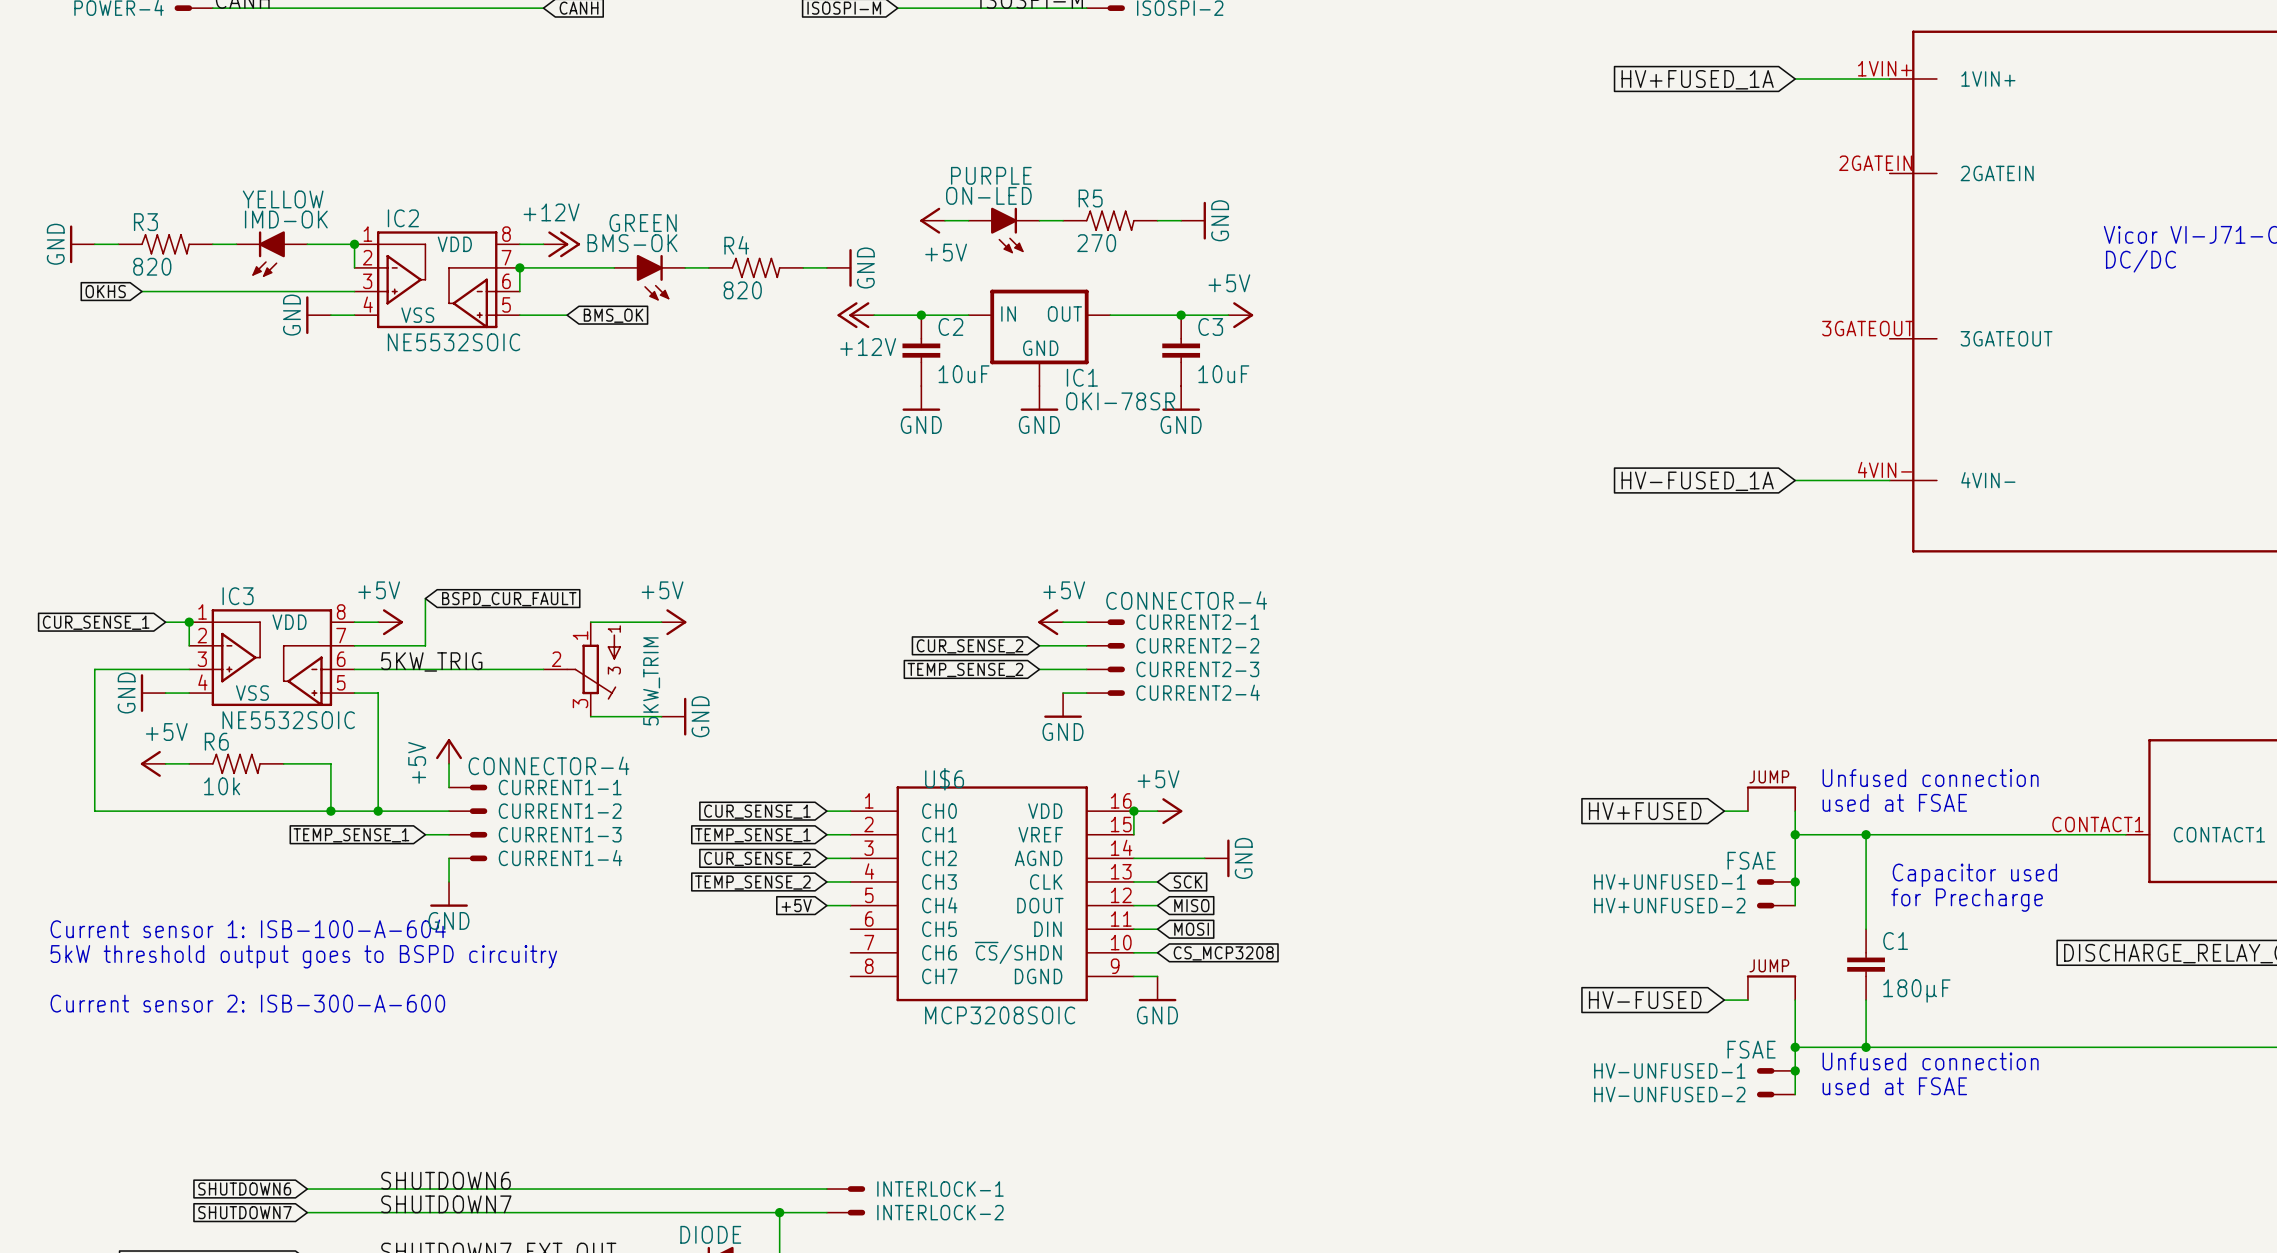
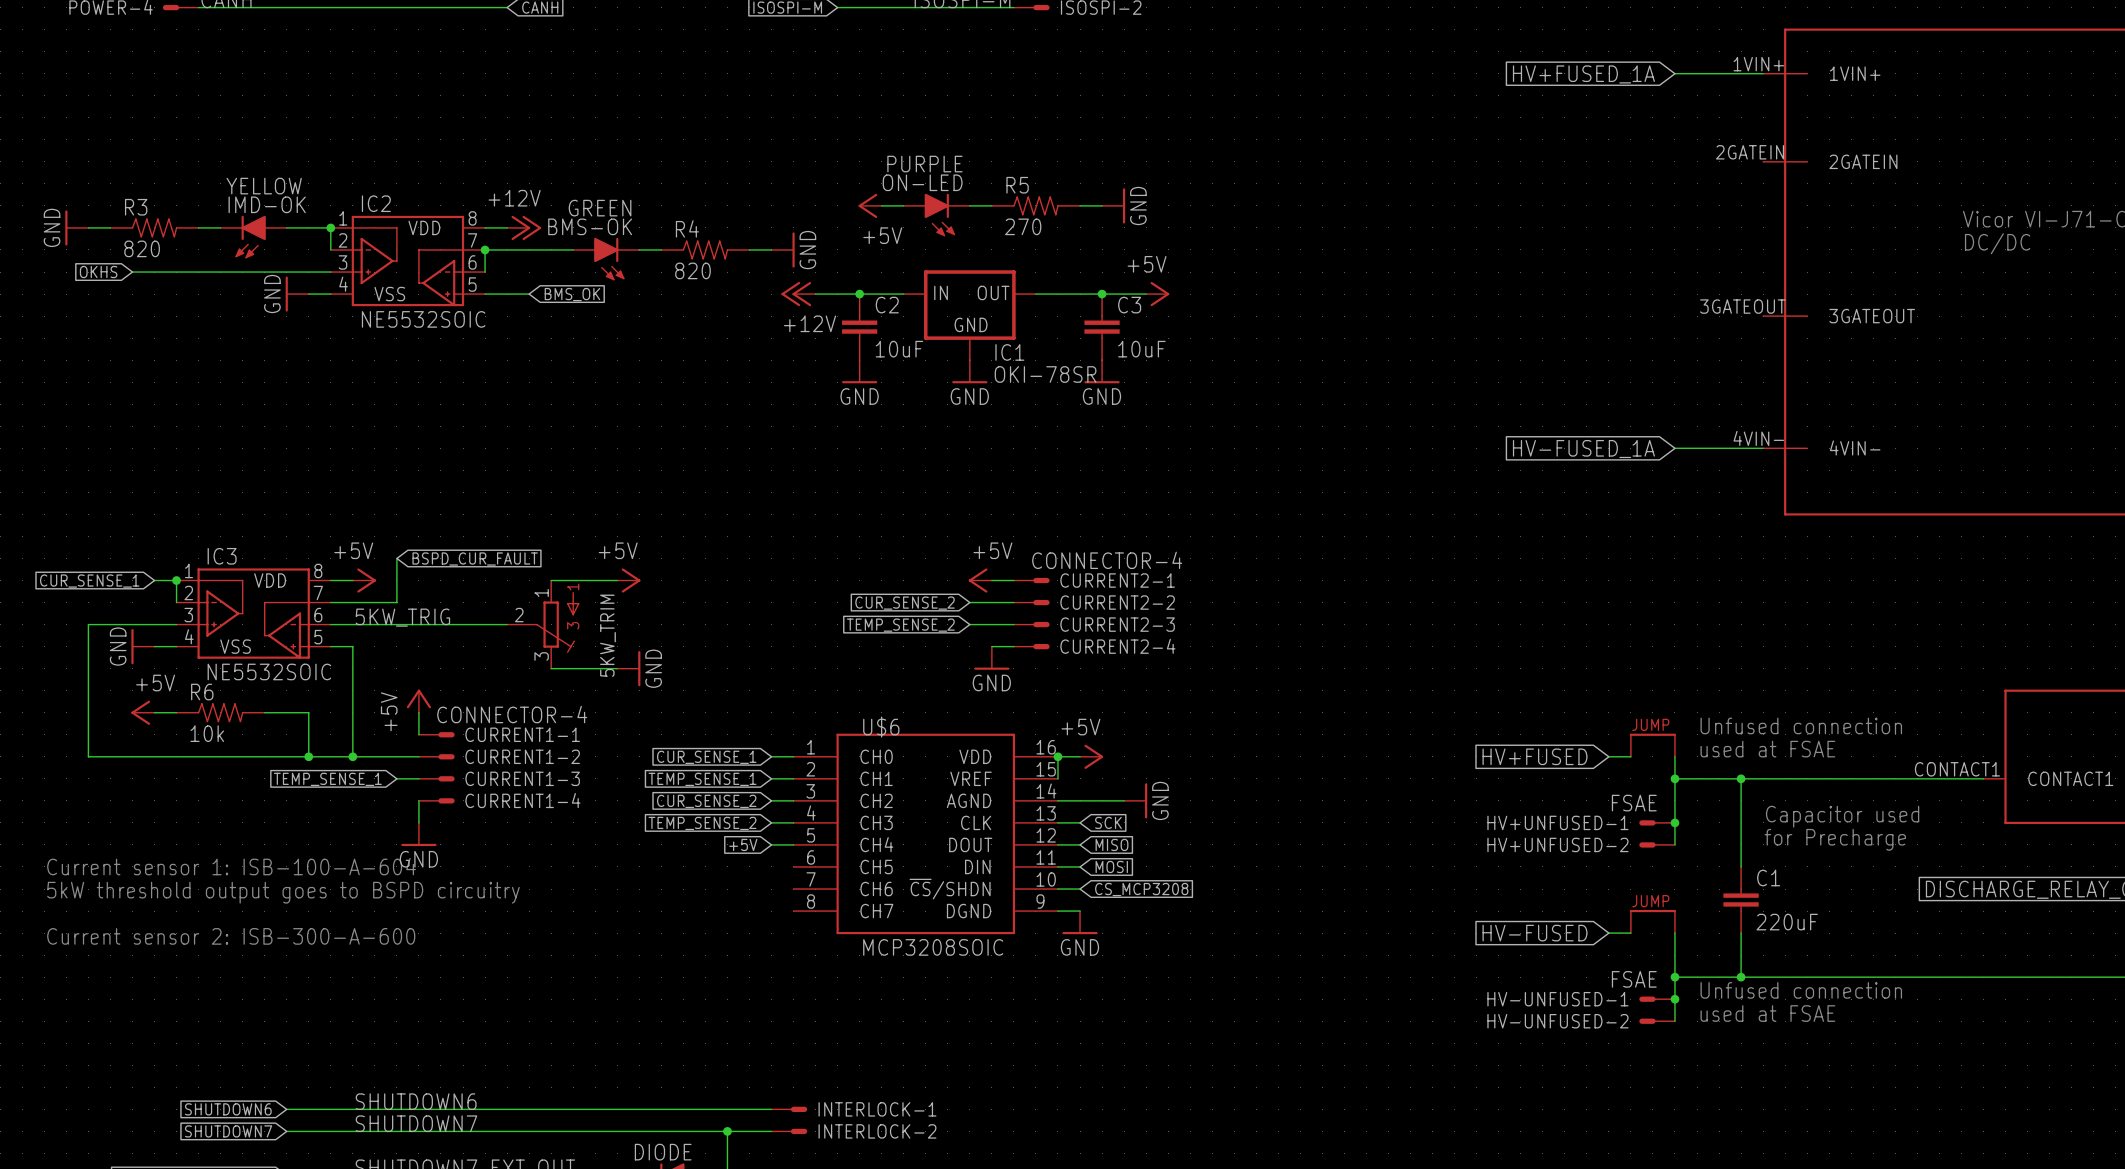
C1 value: 180µF (1916, 991) -> 220uF (1787, 922)

